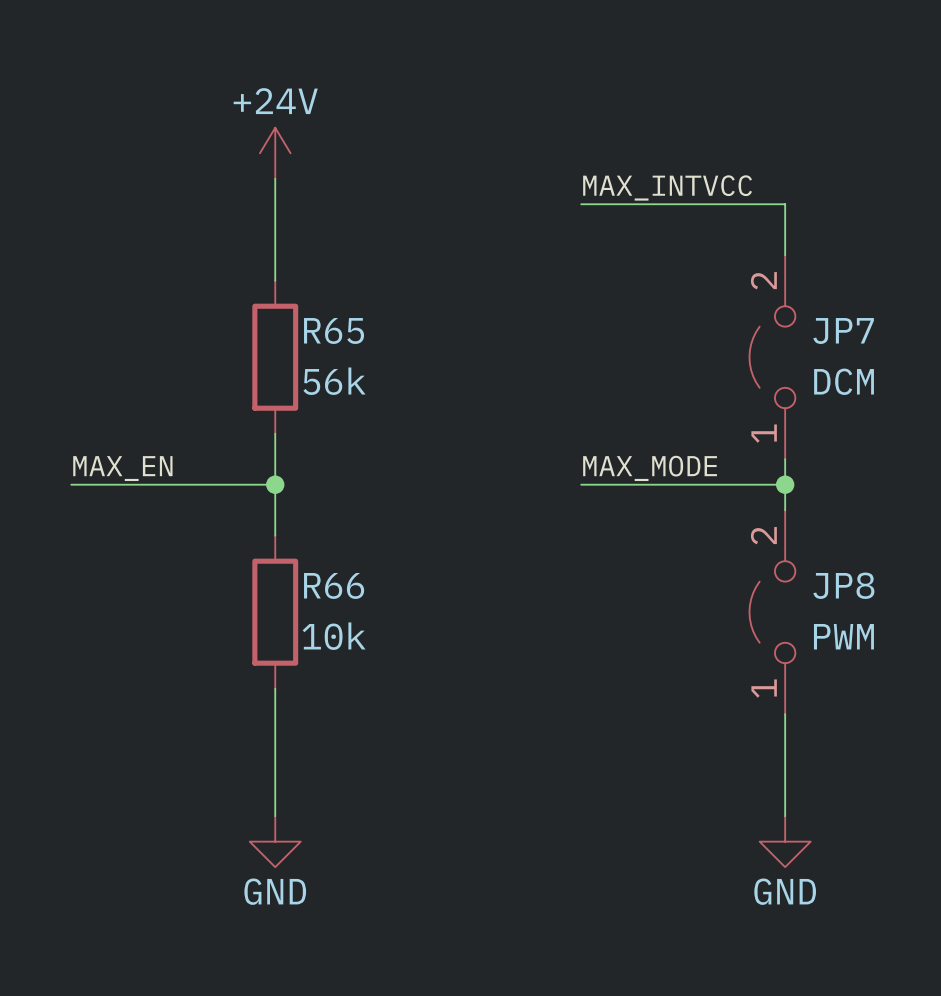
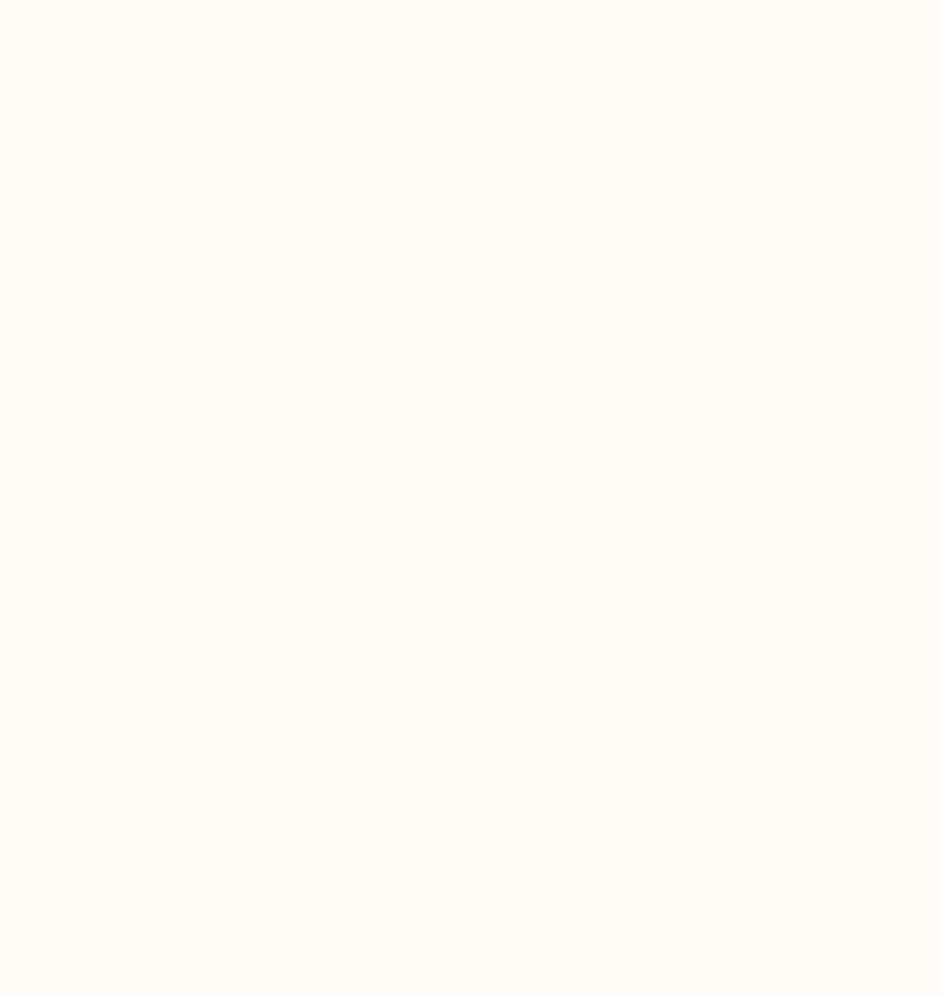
power symbol: +24V (275, 153) -> none
wire: (275, 178) (275, 280) -> none
label: MAX_INTVCC (667, 187) -> none
wire: (581, 204) (785, 204) (785, 255) -> none
R65: 56k (275, 357) -> none
JP7: DCM (772, 357) -> none
wire: (275, 433) (275, 535) -> none
wire: (785, 459) (785, 510) -> none
label: MAX_EN (122, 468) -> none
label: MAX_MODE (650, 468) -> none
wire: (71, 484) (275, 484) -> none
junction: (275, 484) -> none
wire: (581, 484) (785, 484) -> none
junction: (785, 484) -> none
R66: 10k (275, 612) -> none
JP8: PWM (772, 612) -> none
wire: (275, 688) (275, 816) -> none
wire: (785, 714) (785, 816) -> none
power symbol: GND (275, 841) -> none
power symbol: GND (785, 841) -> none

